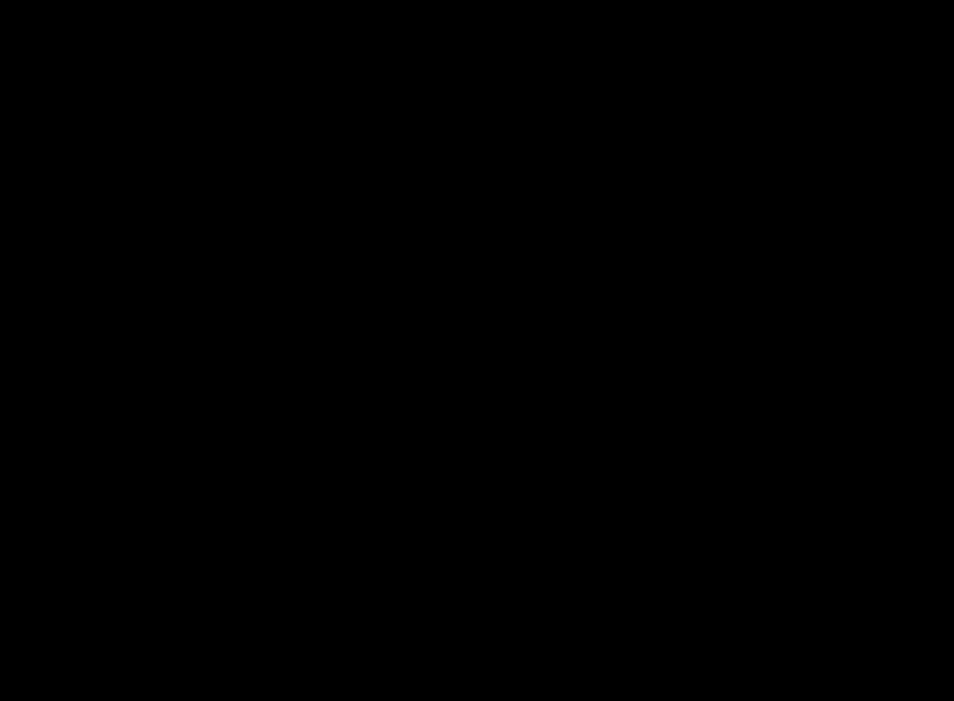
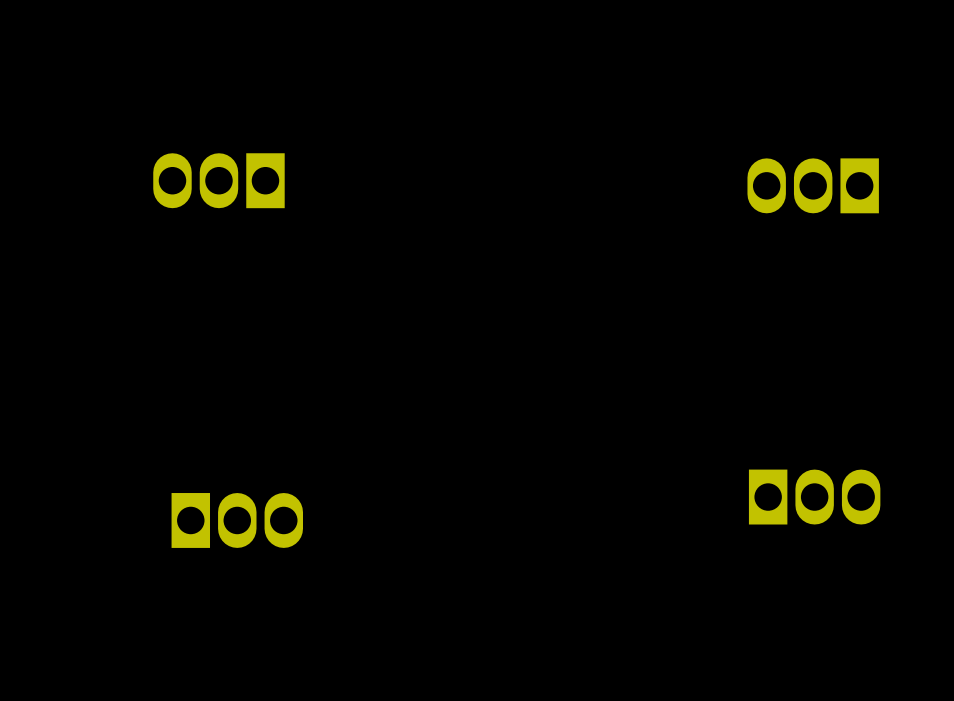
part: none -> (218, 180)
part: none -> (813, 185)
part: none -> (814, 497)
part: none -> (237, 520)

